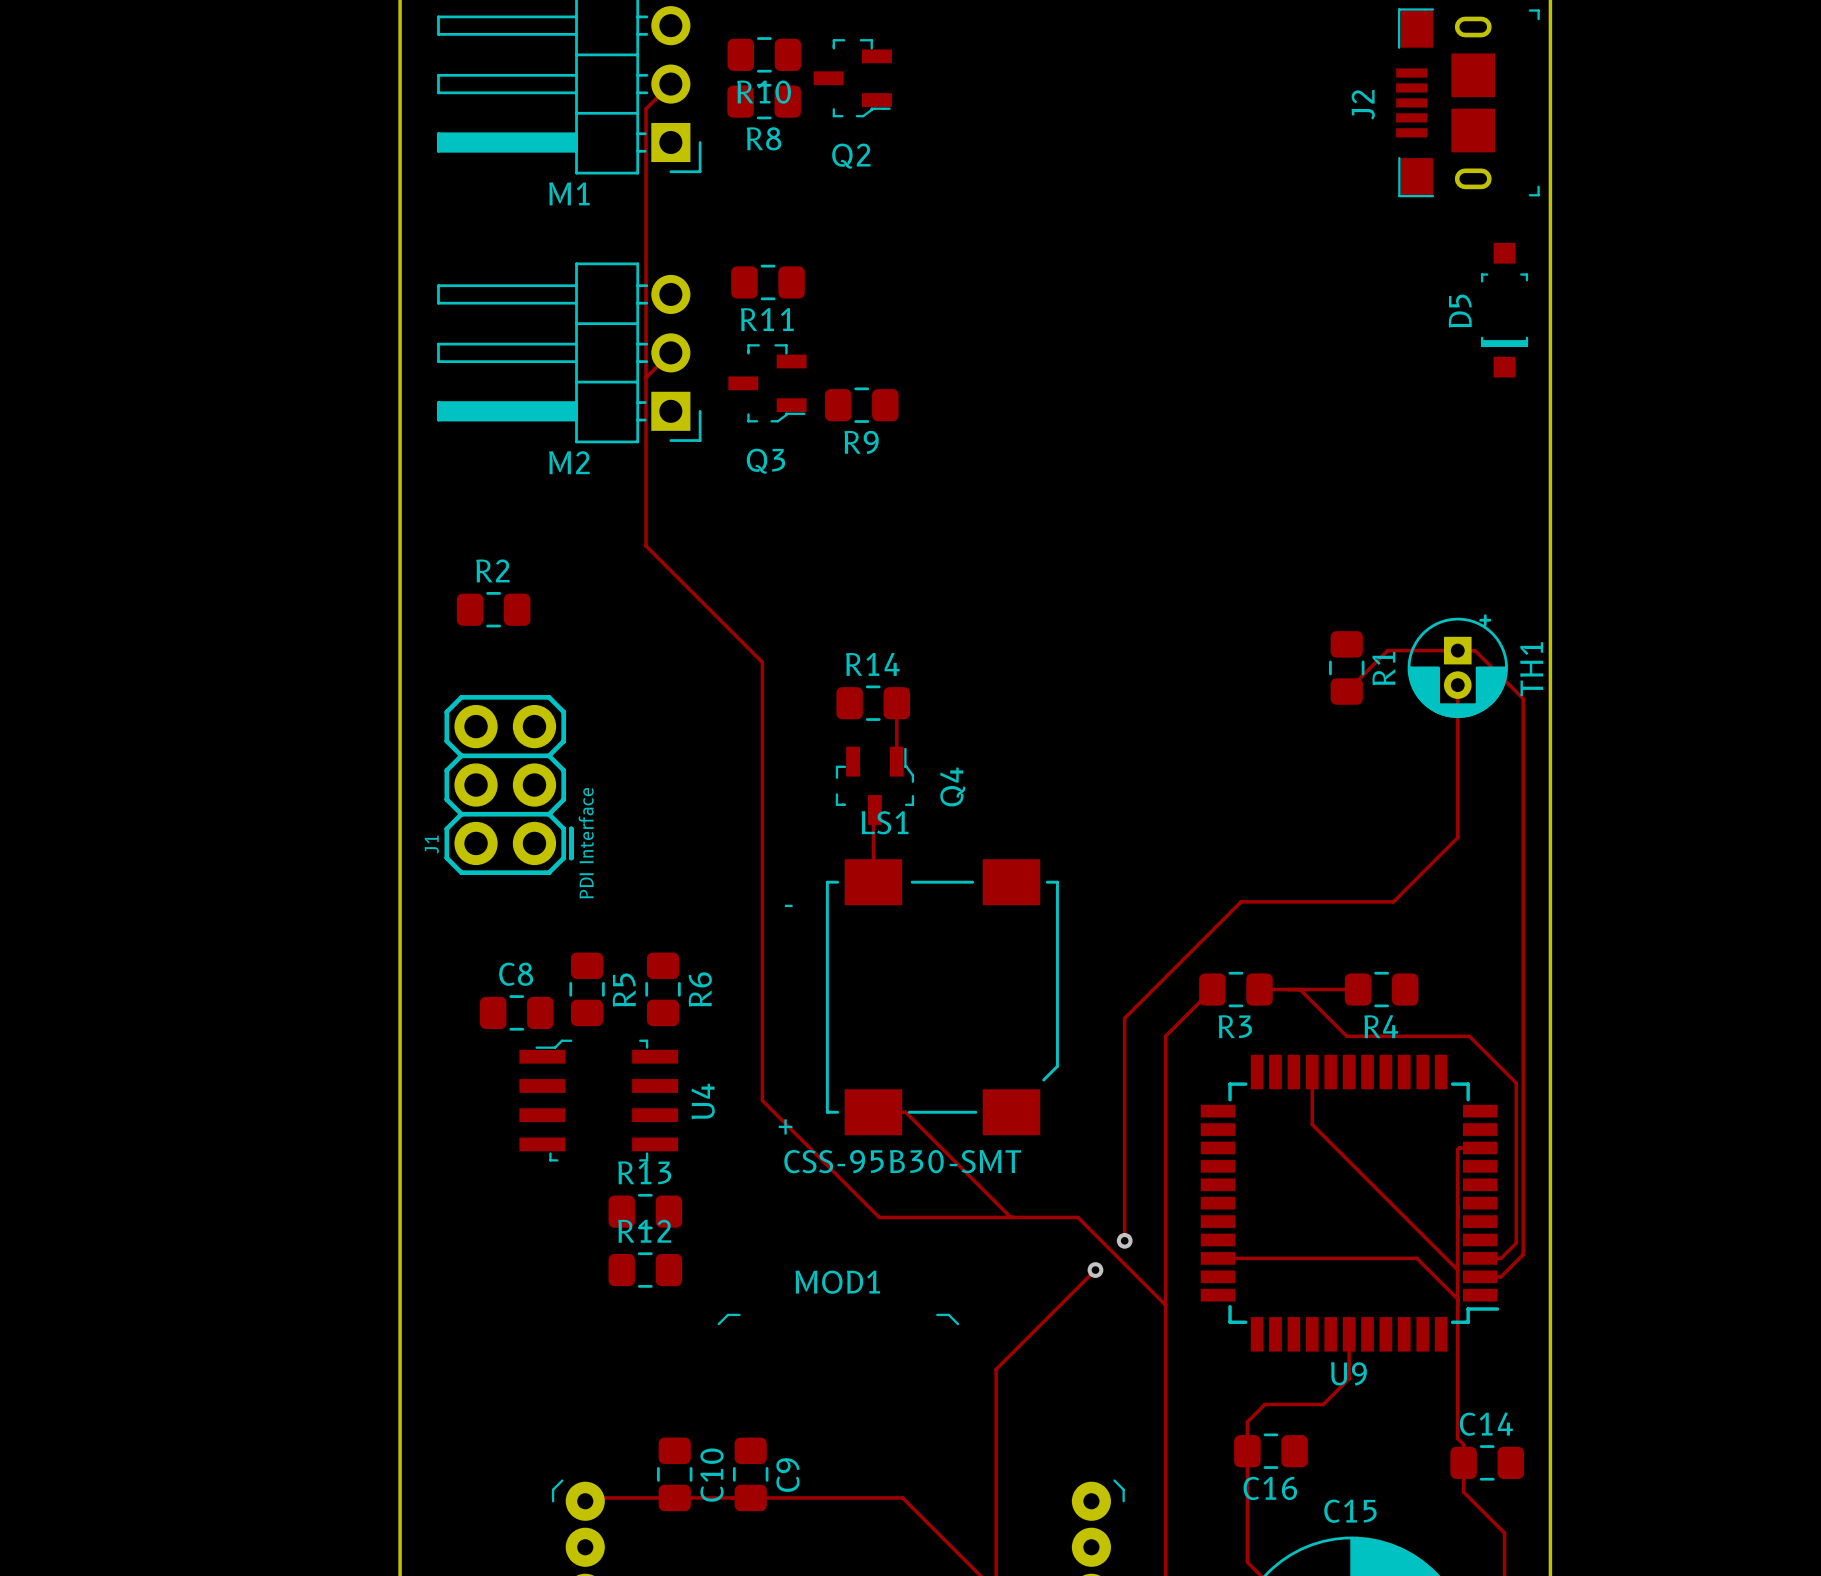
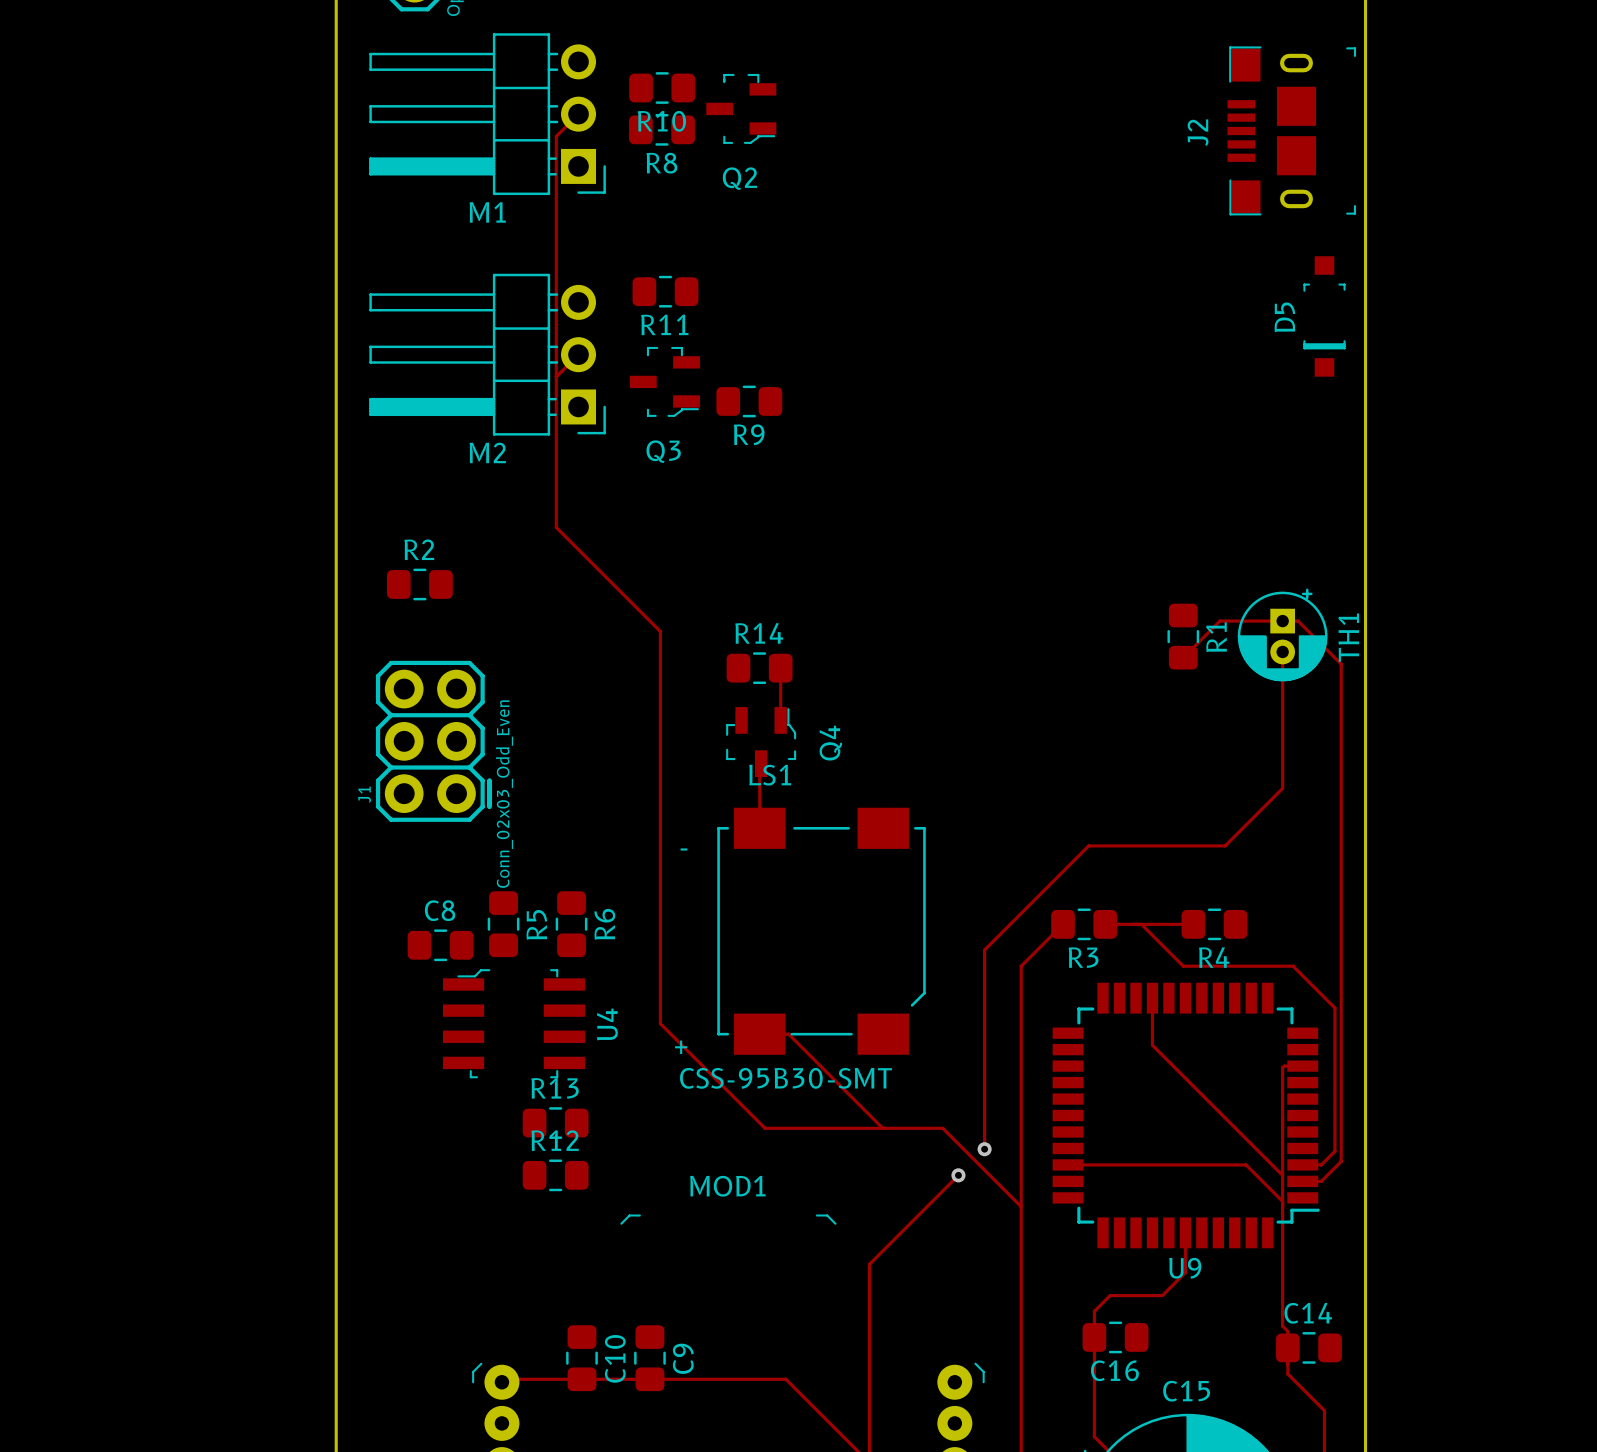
J1 value: PDI Interface (586, 843) -> Conn_02x03_Odd_Even (504, 794)

